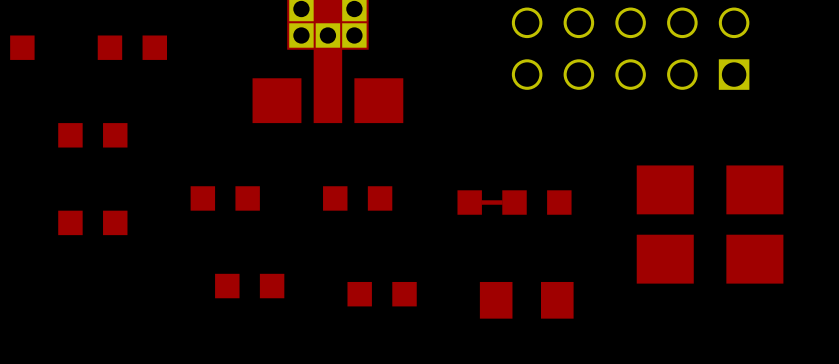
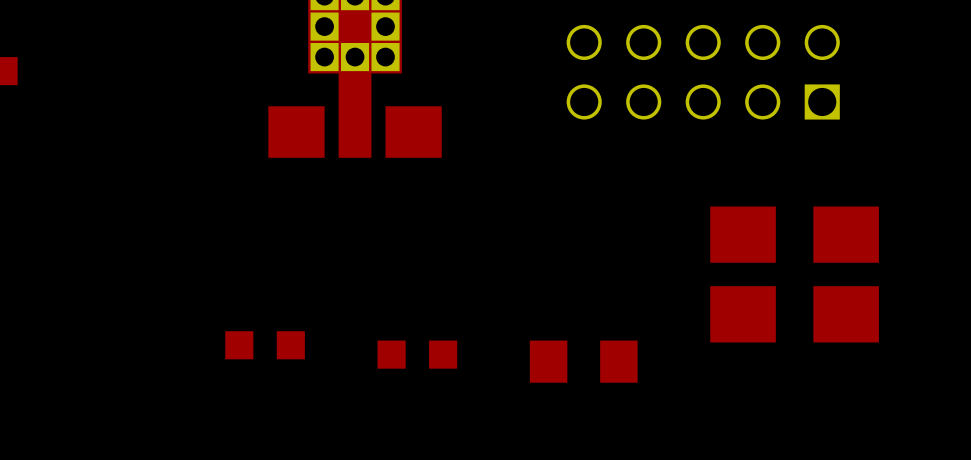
part: (132, 47) -> none
part: (92, 135) -> none
part: (225, 198) -> none
part: (357, 198) -> none
part: (514, 202) -> none
part: (92, 222) -> none

